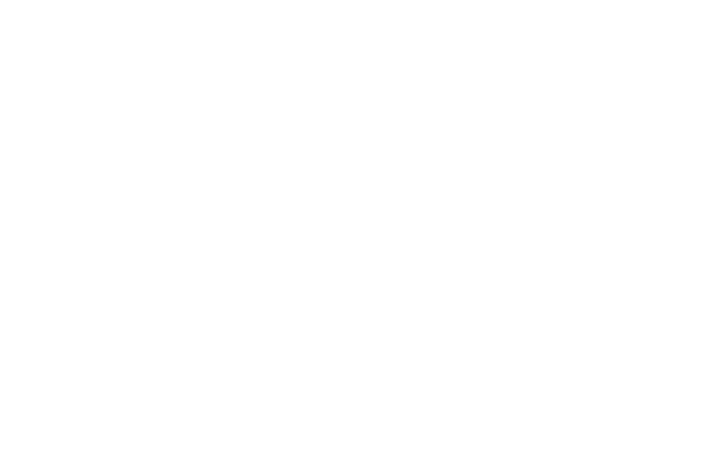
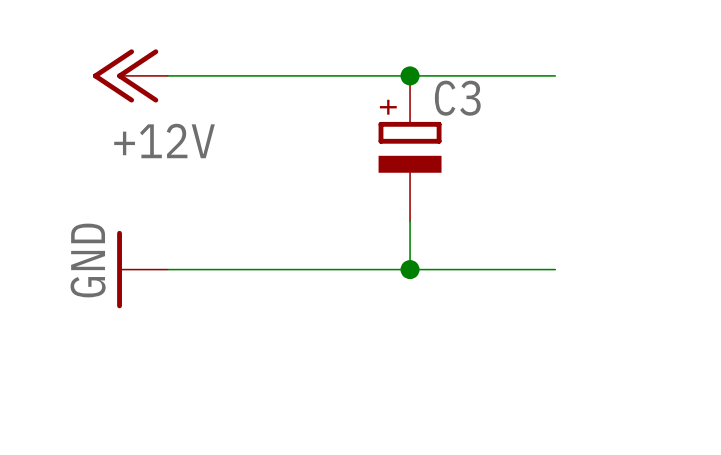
power symbol: none -> +12V (130, 75)
wire: none -> (167, 75) (555, 75)
junction: none -> (410, 75)
C3: none -> (410, 148)
wire: none -> (410, 221) (410, 269)
power symbol: none -> GND (142, 269)
wire: none -> (167, 269) (555, 269)
junction: none -> (410, 269)

